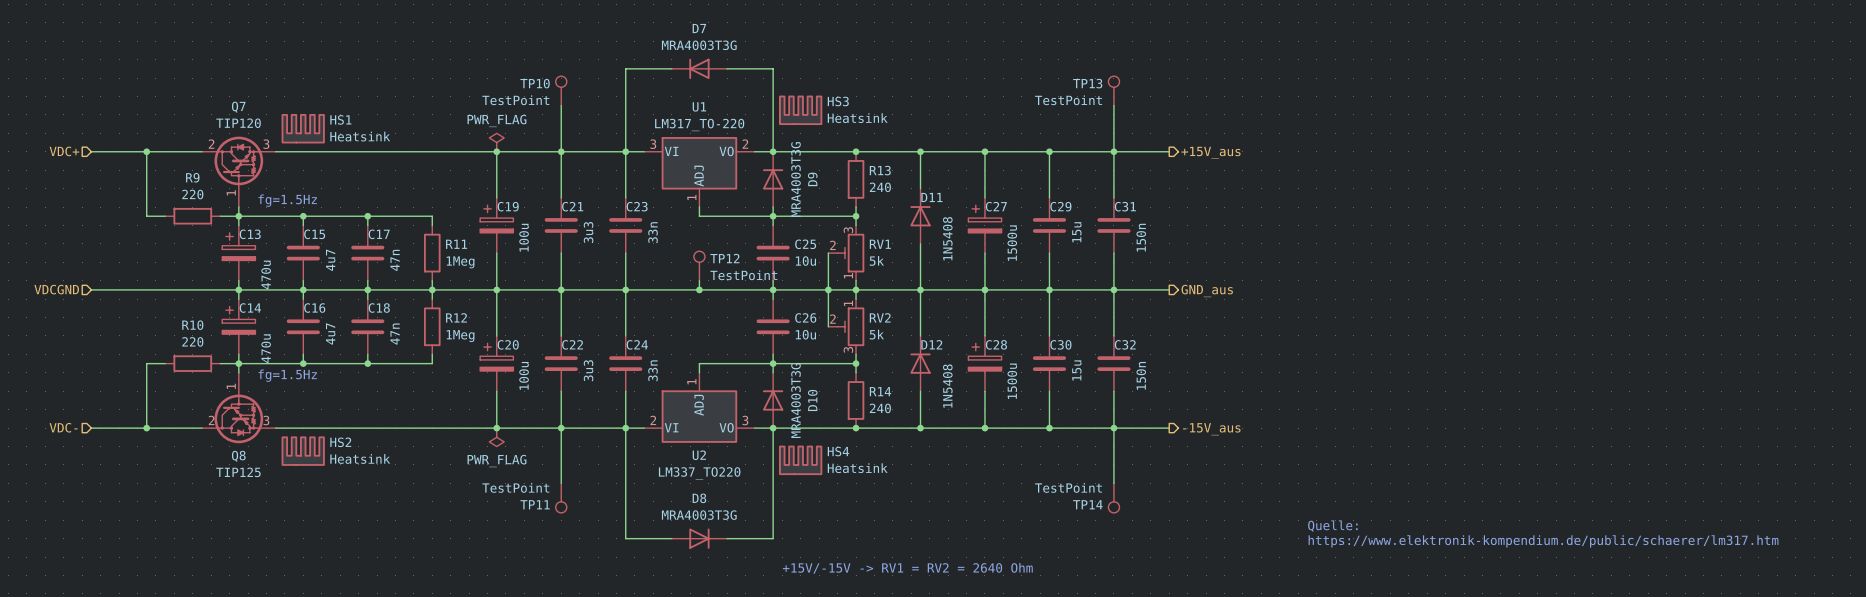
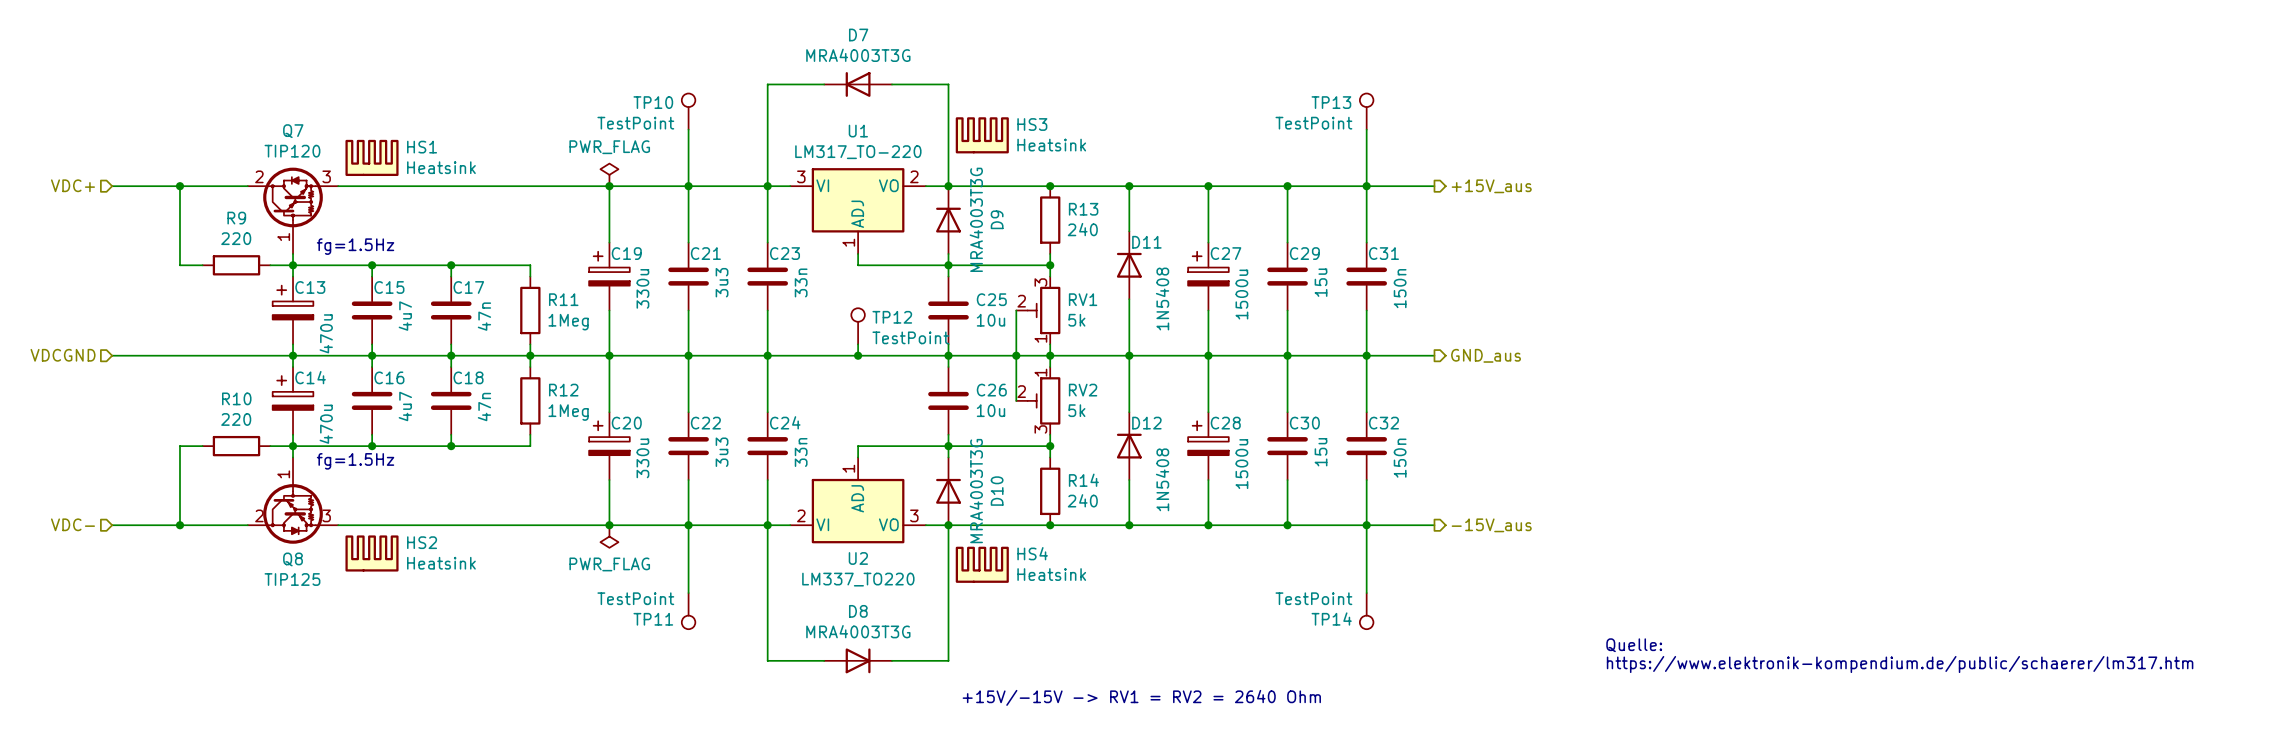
C19 value: 100u (524, 237) -> 330u (642, 288)
C20 value: 100u (524, 375) -> 330u (642, 458)

